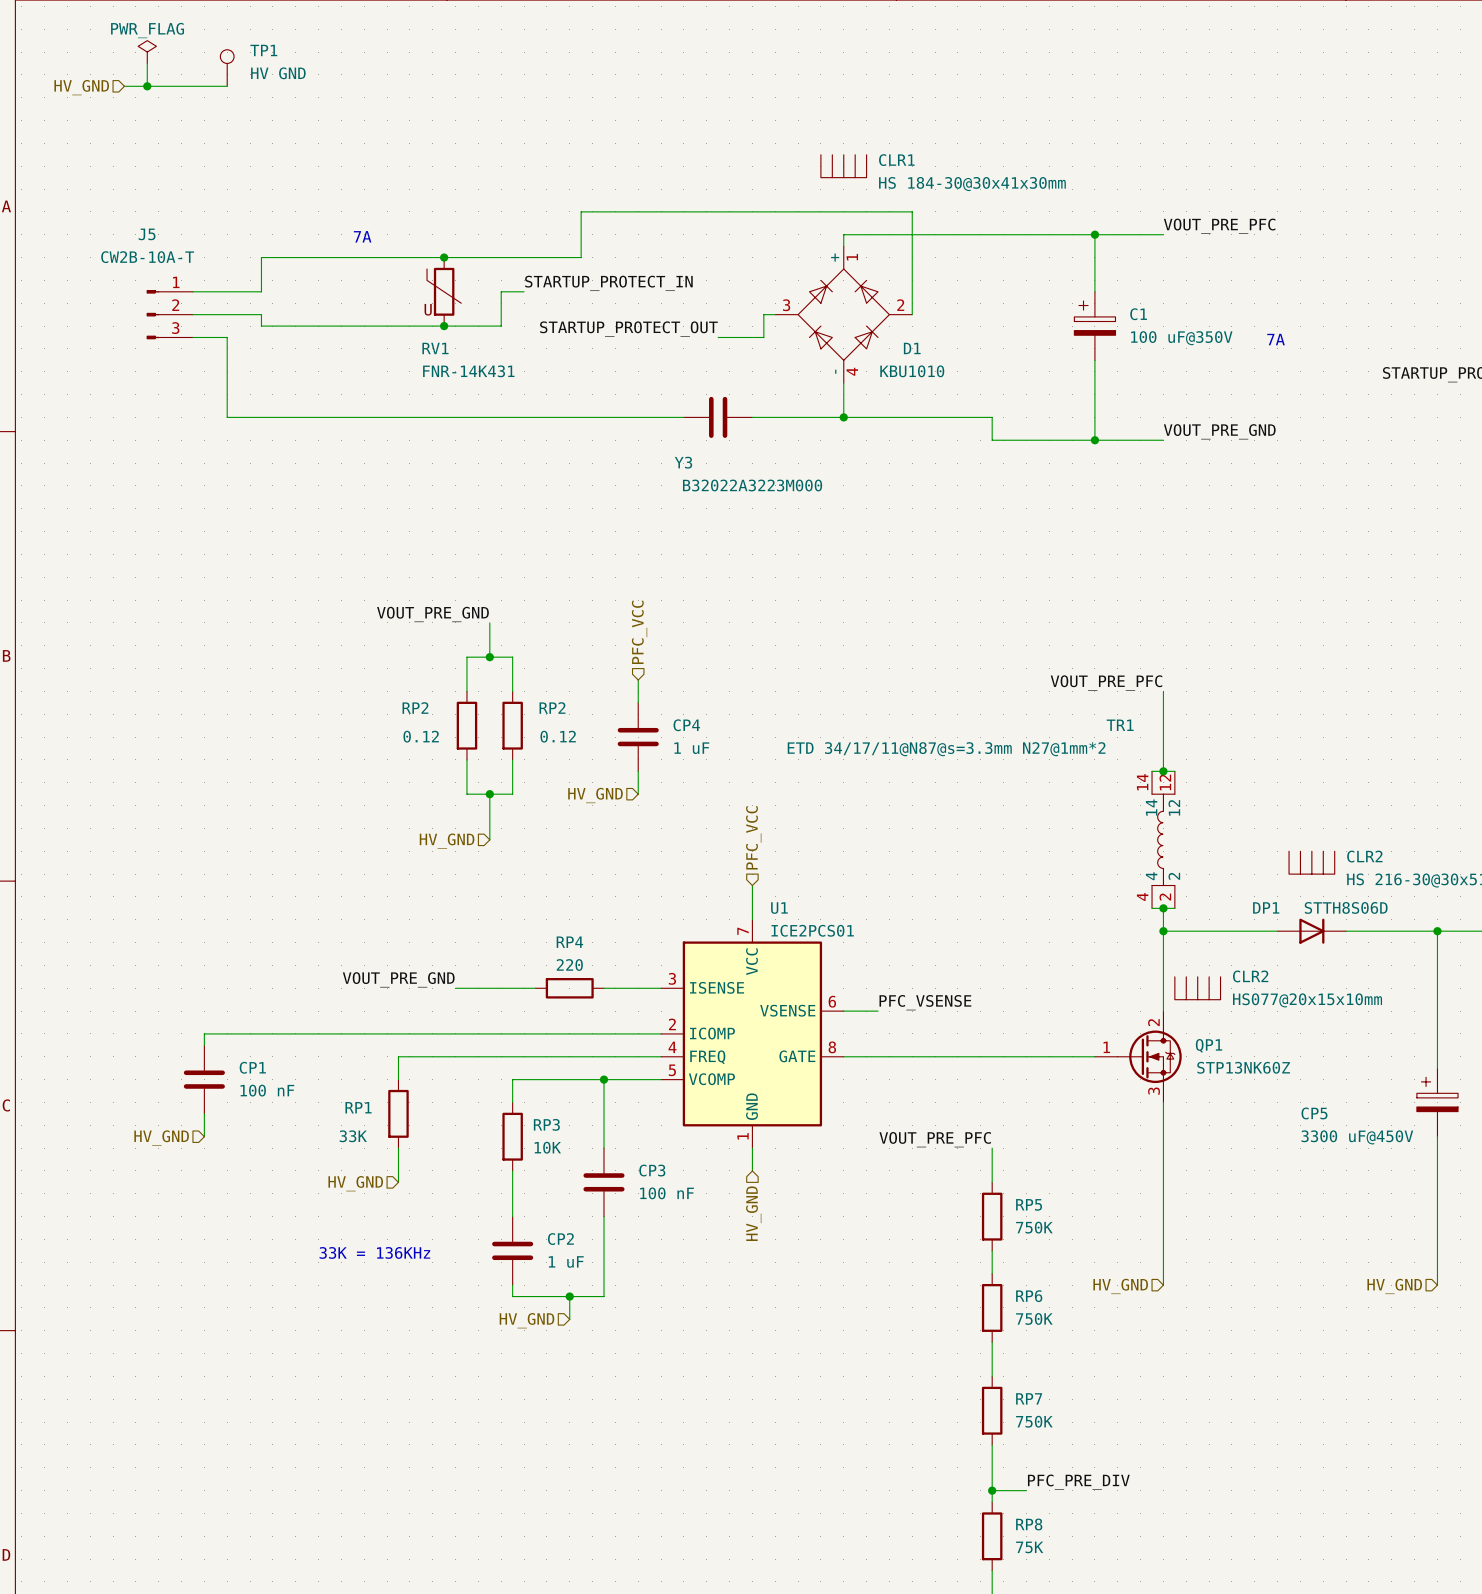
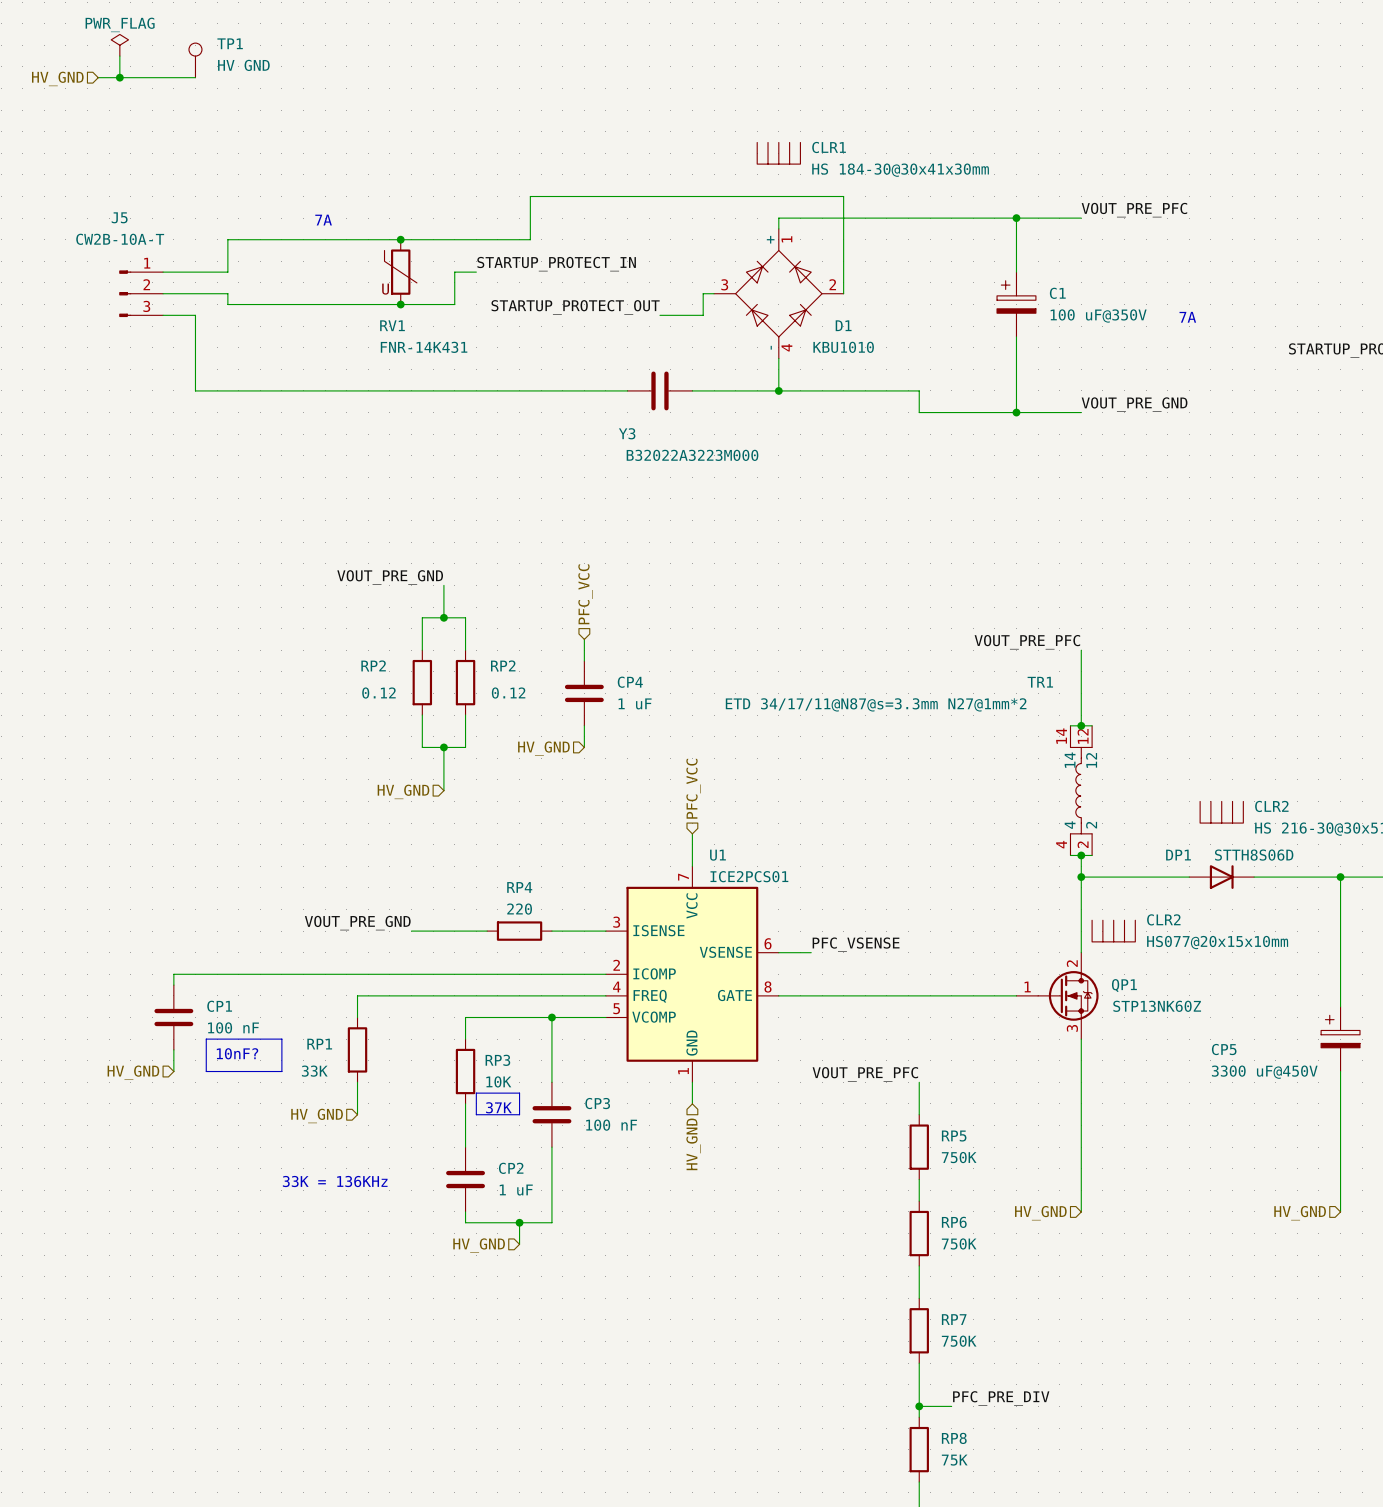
line: none -> (206, 1039) (281, 1039) (281, 1071) (206, 1071) (206, 1039)
text: none -> 10nF? (237, 1053)
line: none -> (476, 1093) (519, 1093) (519, 1114) (476, 1114) (476, 1093)
text: none -> 37K (498, 1107)

